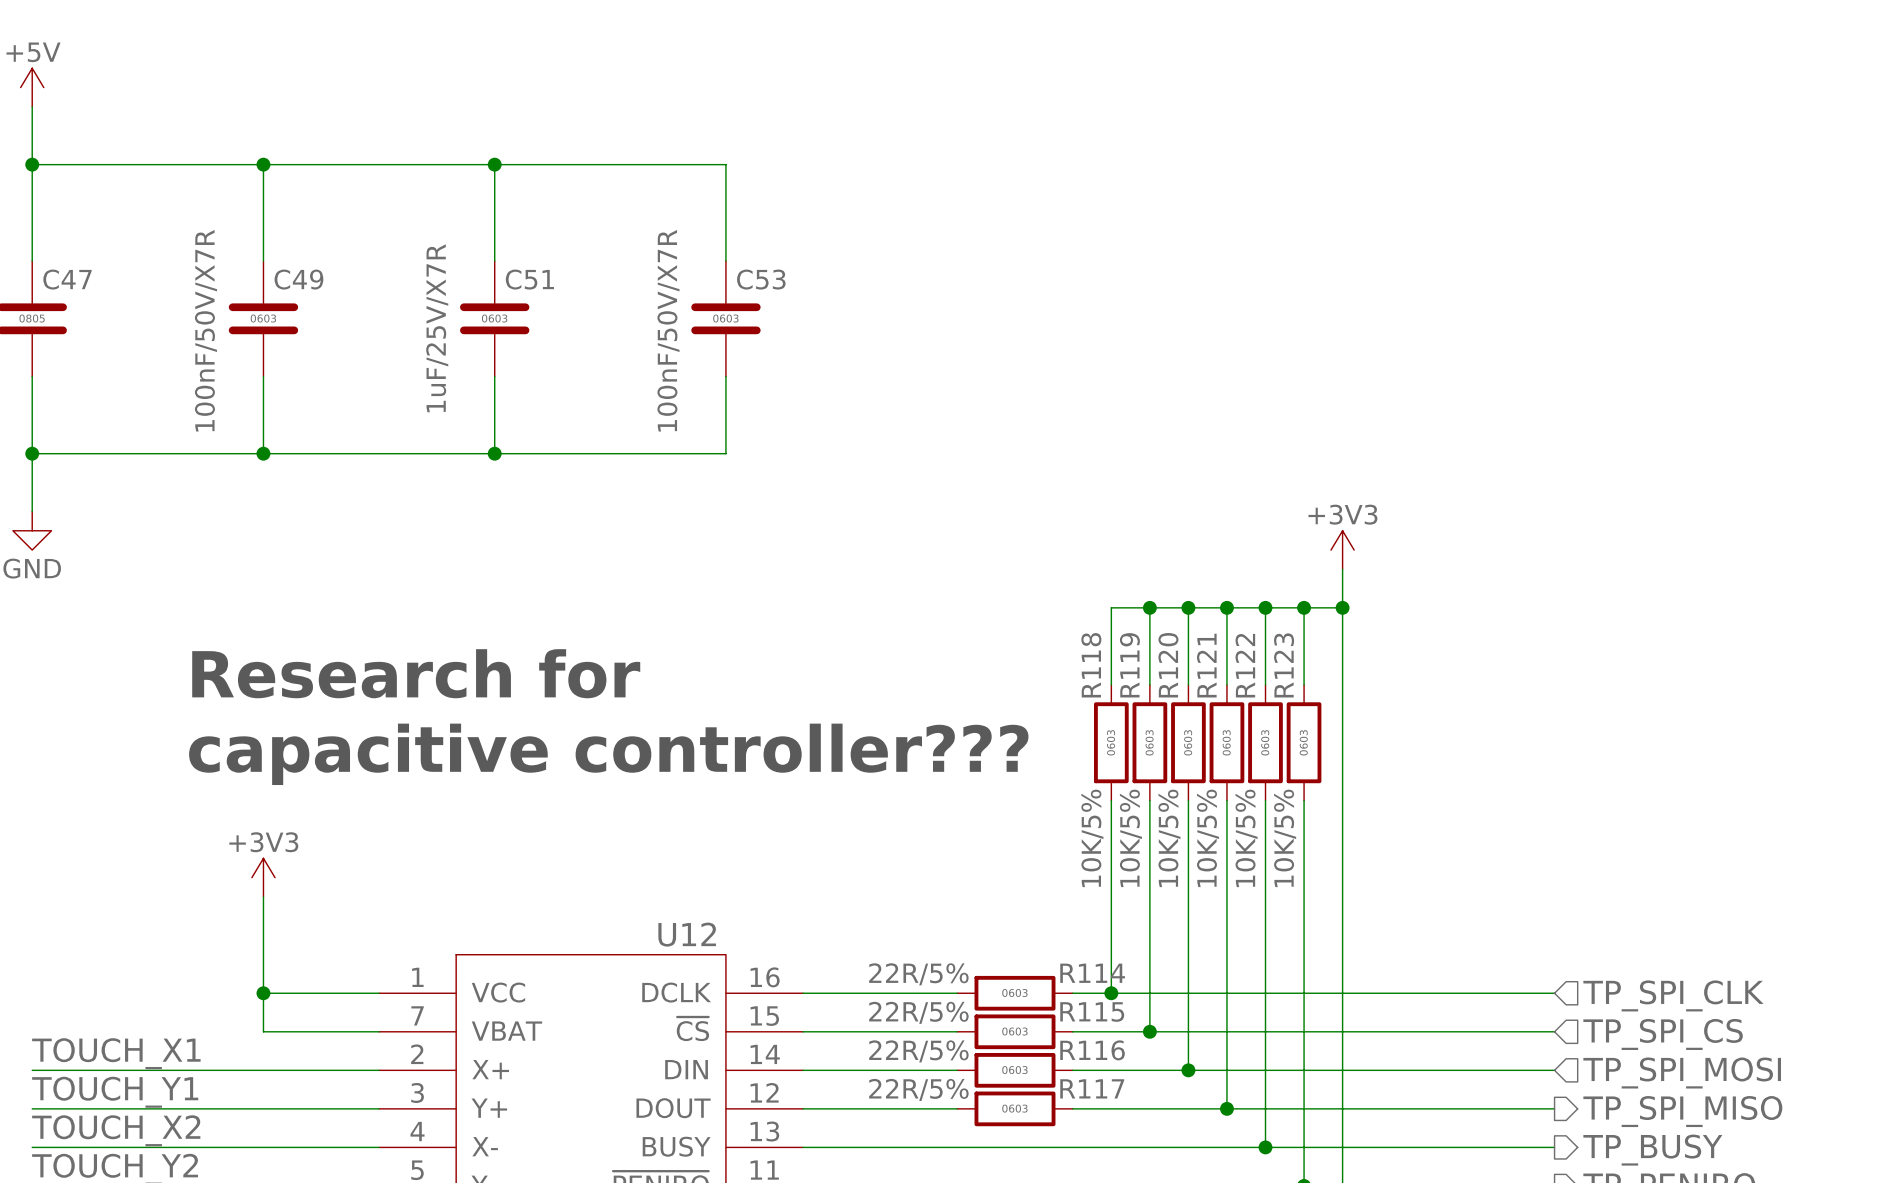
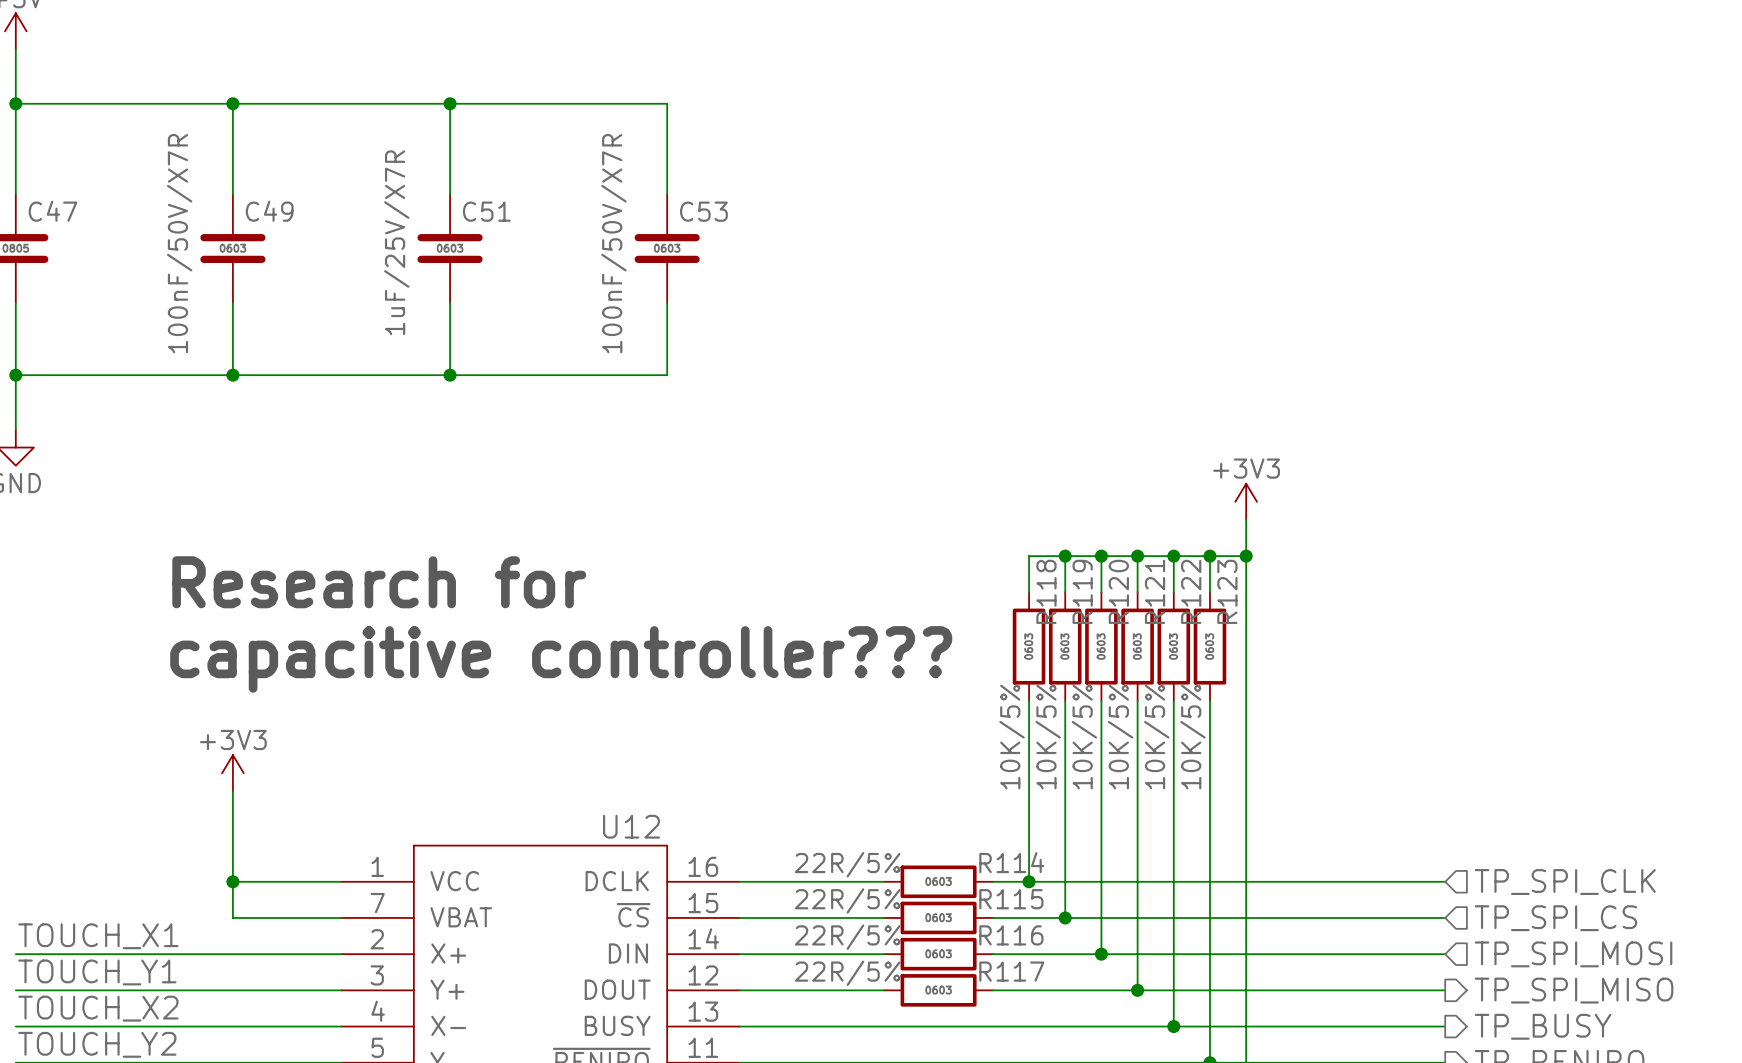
power symbol position: +3V3 (1342, 550) -> +3V3 (1246, 501)
wire: (1342, 569) (1342, 607) (1111, 607) (1111, 646) -> (1246, 556) (1029, 556)
wire: (1149, 607) (1149, 646) -> none
junction: (1149, 607) -> none
wire: (1188, 607) (1188, 646) -> none
junction: (1188, 607) -> none
wire: (1226, 607) (1226, 646) -> none
junction: (1226, 607) -> none
wire: (1265, 607) (1265, 646) -> none
junction: (1265, 607) -> none
wire: (1304, 607) (1304, 646) -> none
junction: (1304, 607) -> none
junction: (1342, 607) -> none
junction: none -> (1065, 556)
junction: none -> (1101, 556)
junction: none -> (1137, 556)
junction: none -> (1173, 556)
junction: none -> (1209, 556)
junction: none -> (1246, 556)
R118 name position: R118 (1091, 665) -> R118 (1046, 591)
R119 name position: R119 (1129, 665) -> R119 (1082, 591)
R120 name position: R120 (1168, 665) -> R120 (1118, 591)
R121 name position: R121 (1206, 665) -> R121 (1155, 591)
R122 name position: R122 (1245, 665) -> R122 (1191, 591)
R123 name position: R123 (1284, 665) -> R123 (1227, 591)

